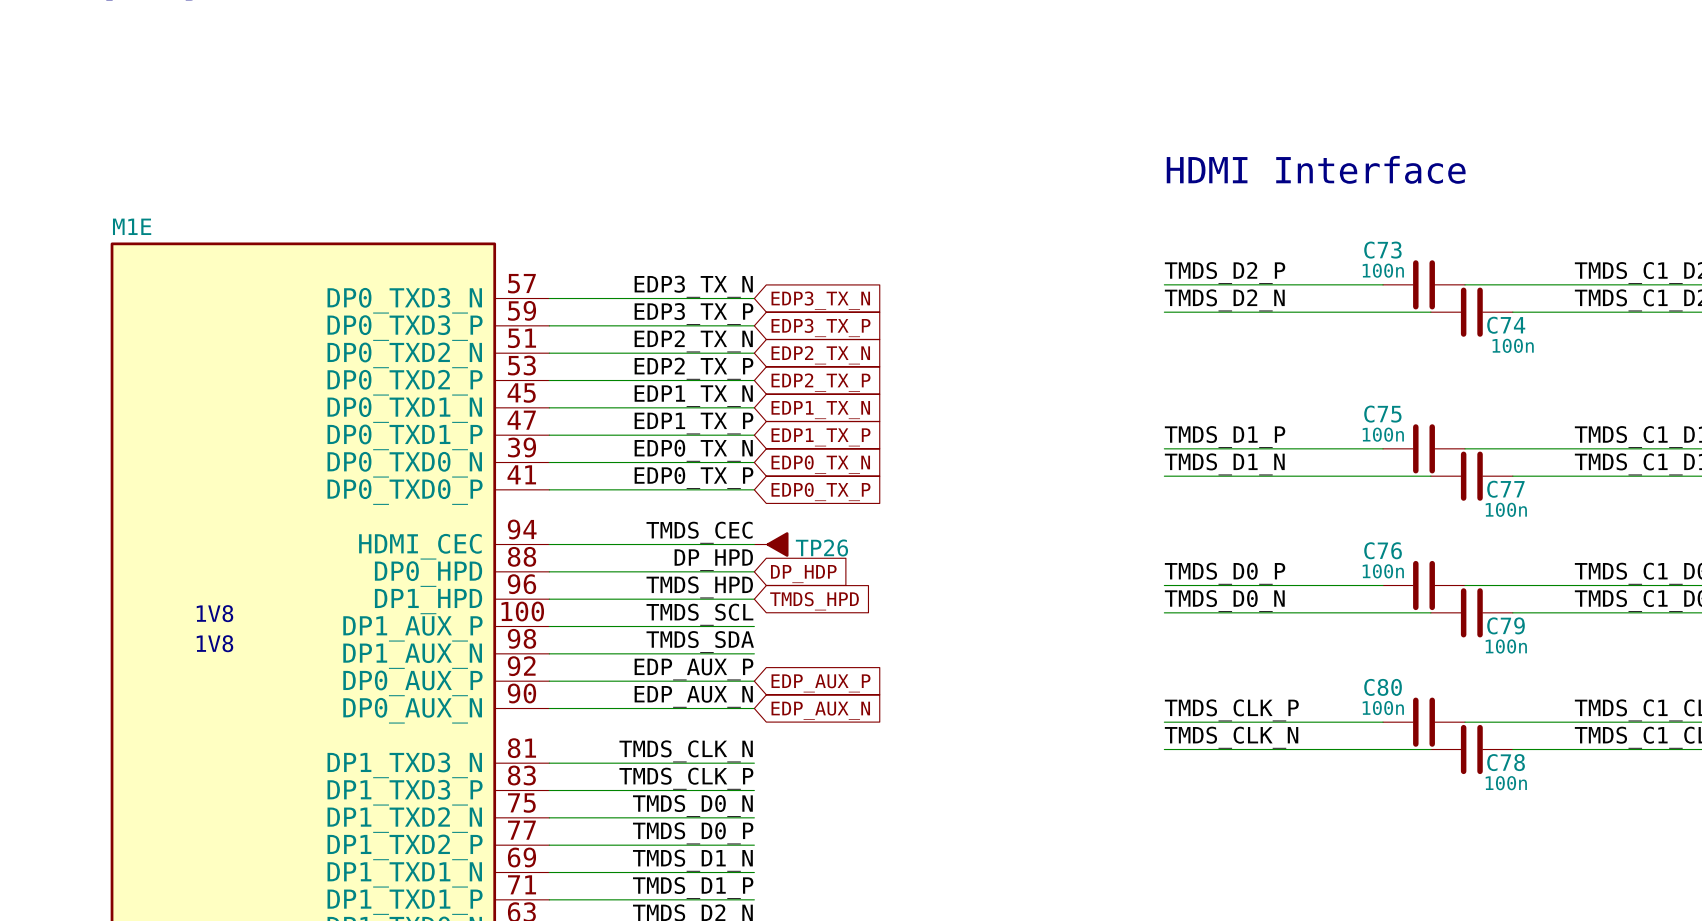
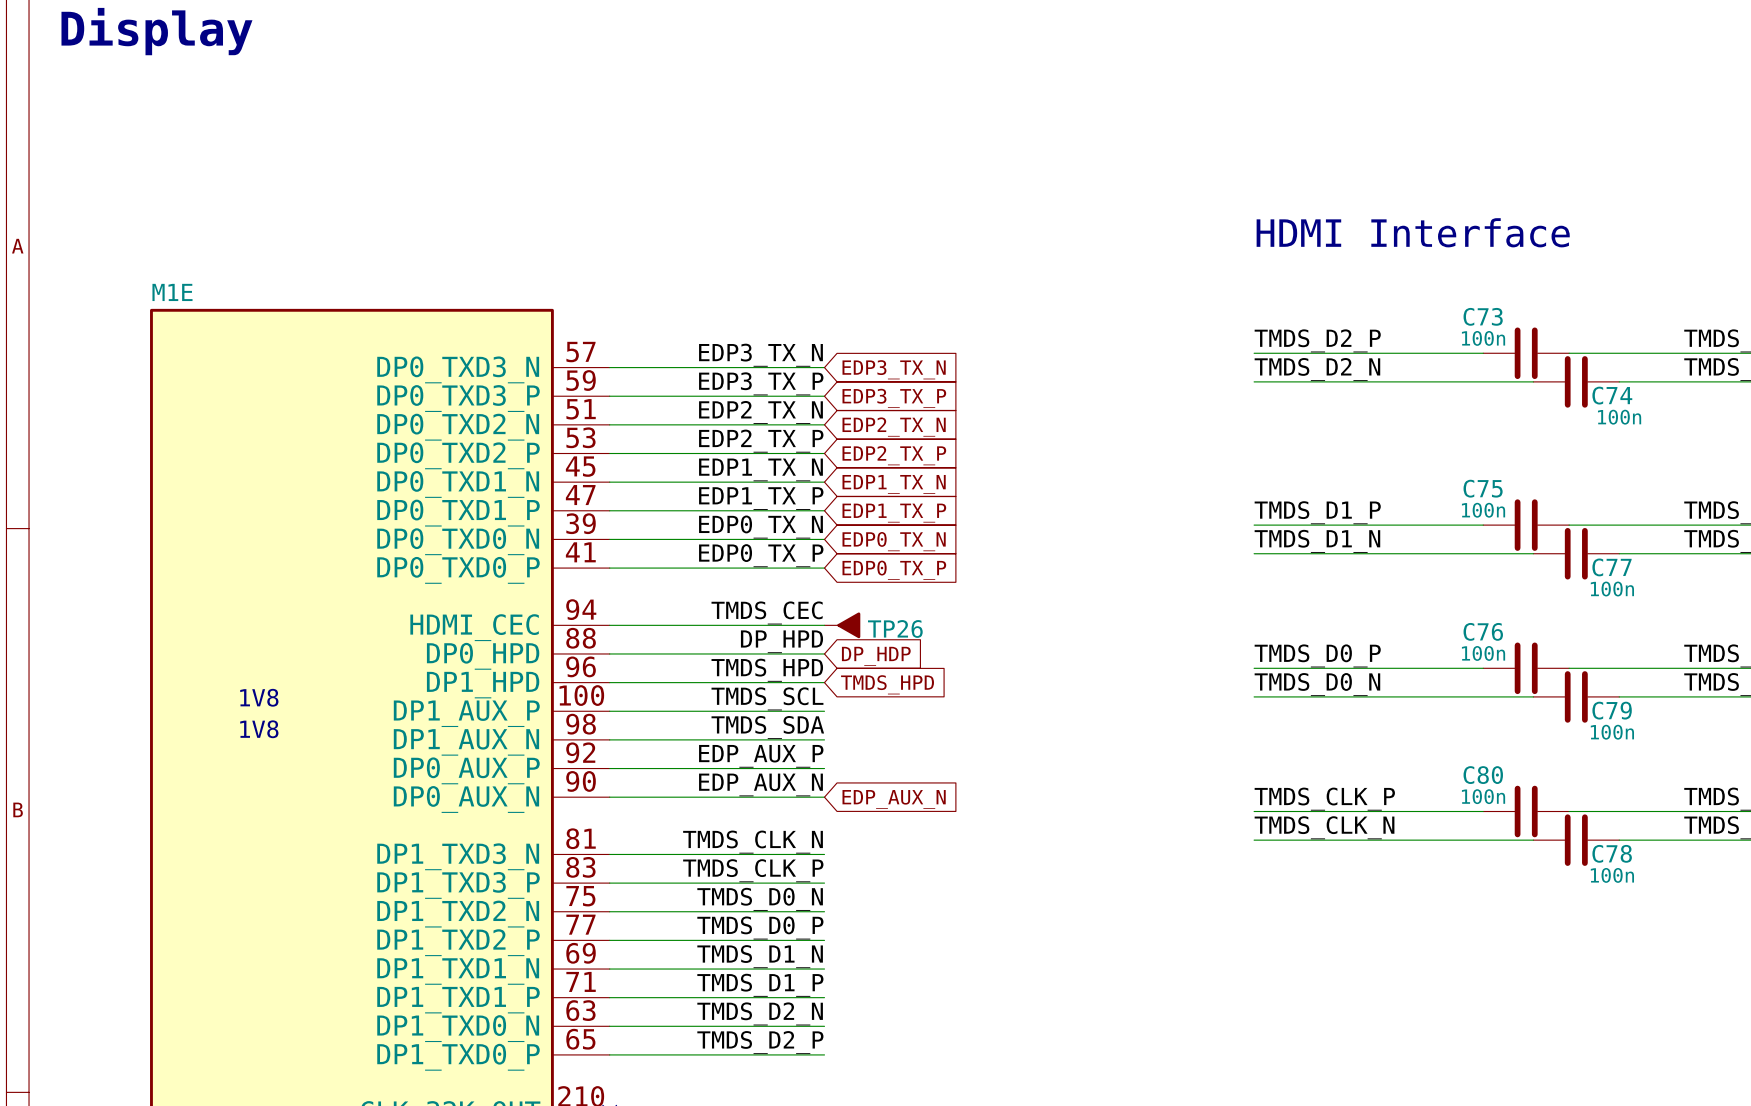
global label: EDP_AUX_P (820, 683) -> none

